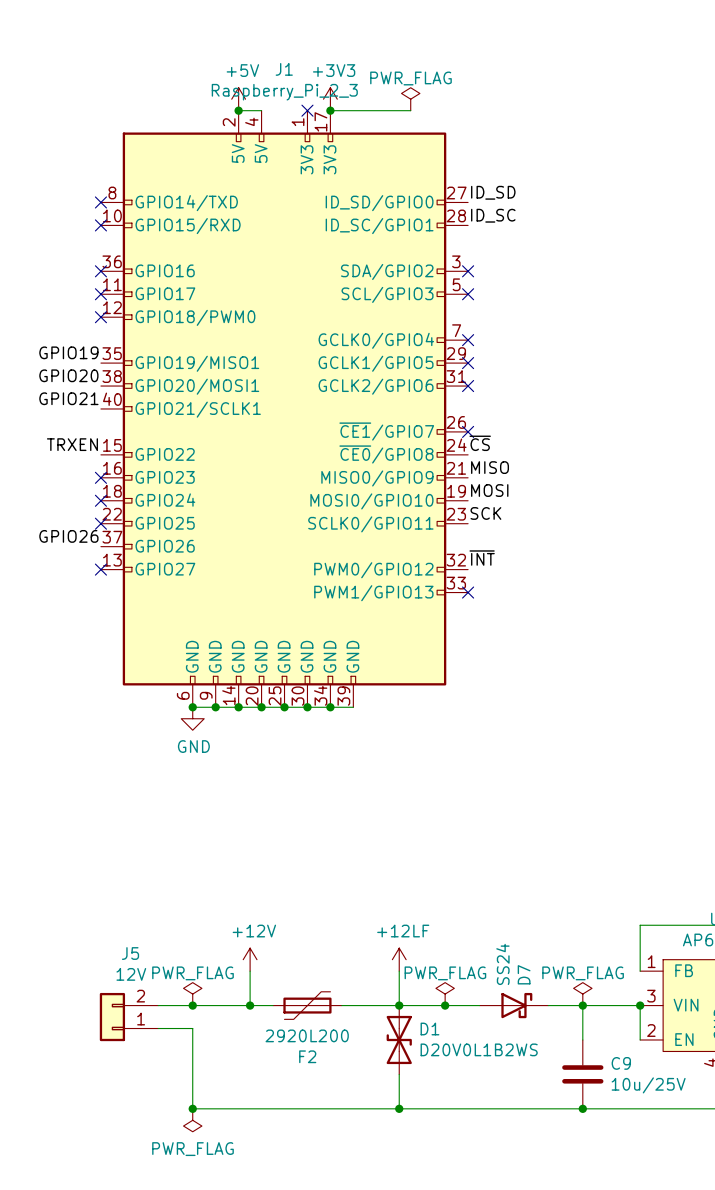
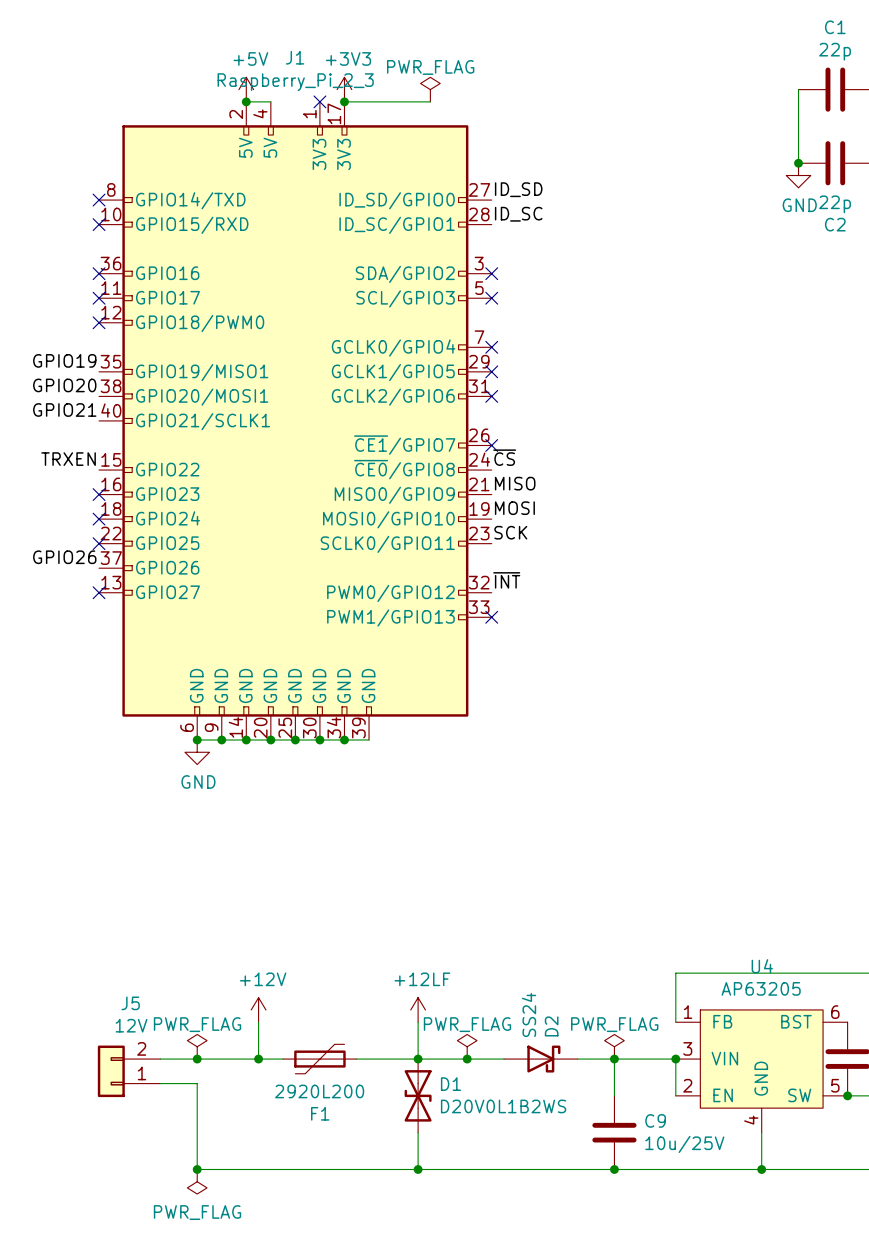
D7 name: D7 (524, 974) -> D2 (551, 1026)
F2 name: F2 (307, 1056) -> F1 (320, 1113)

